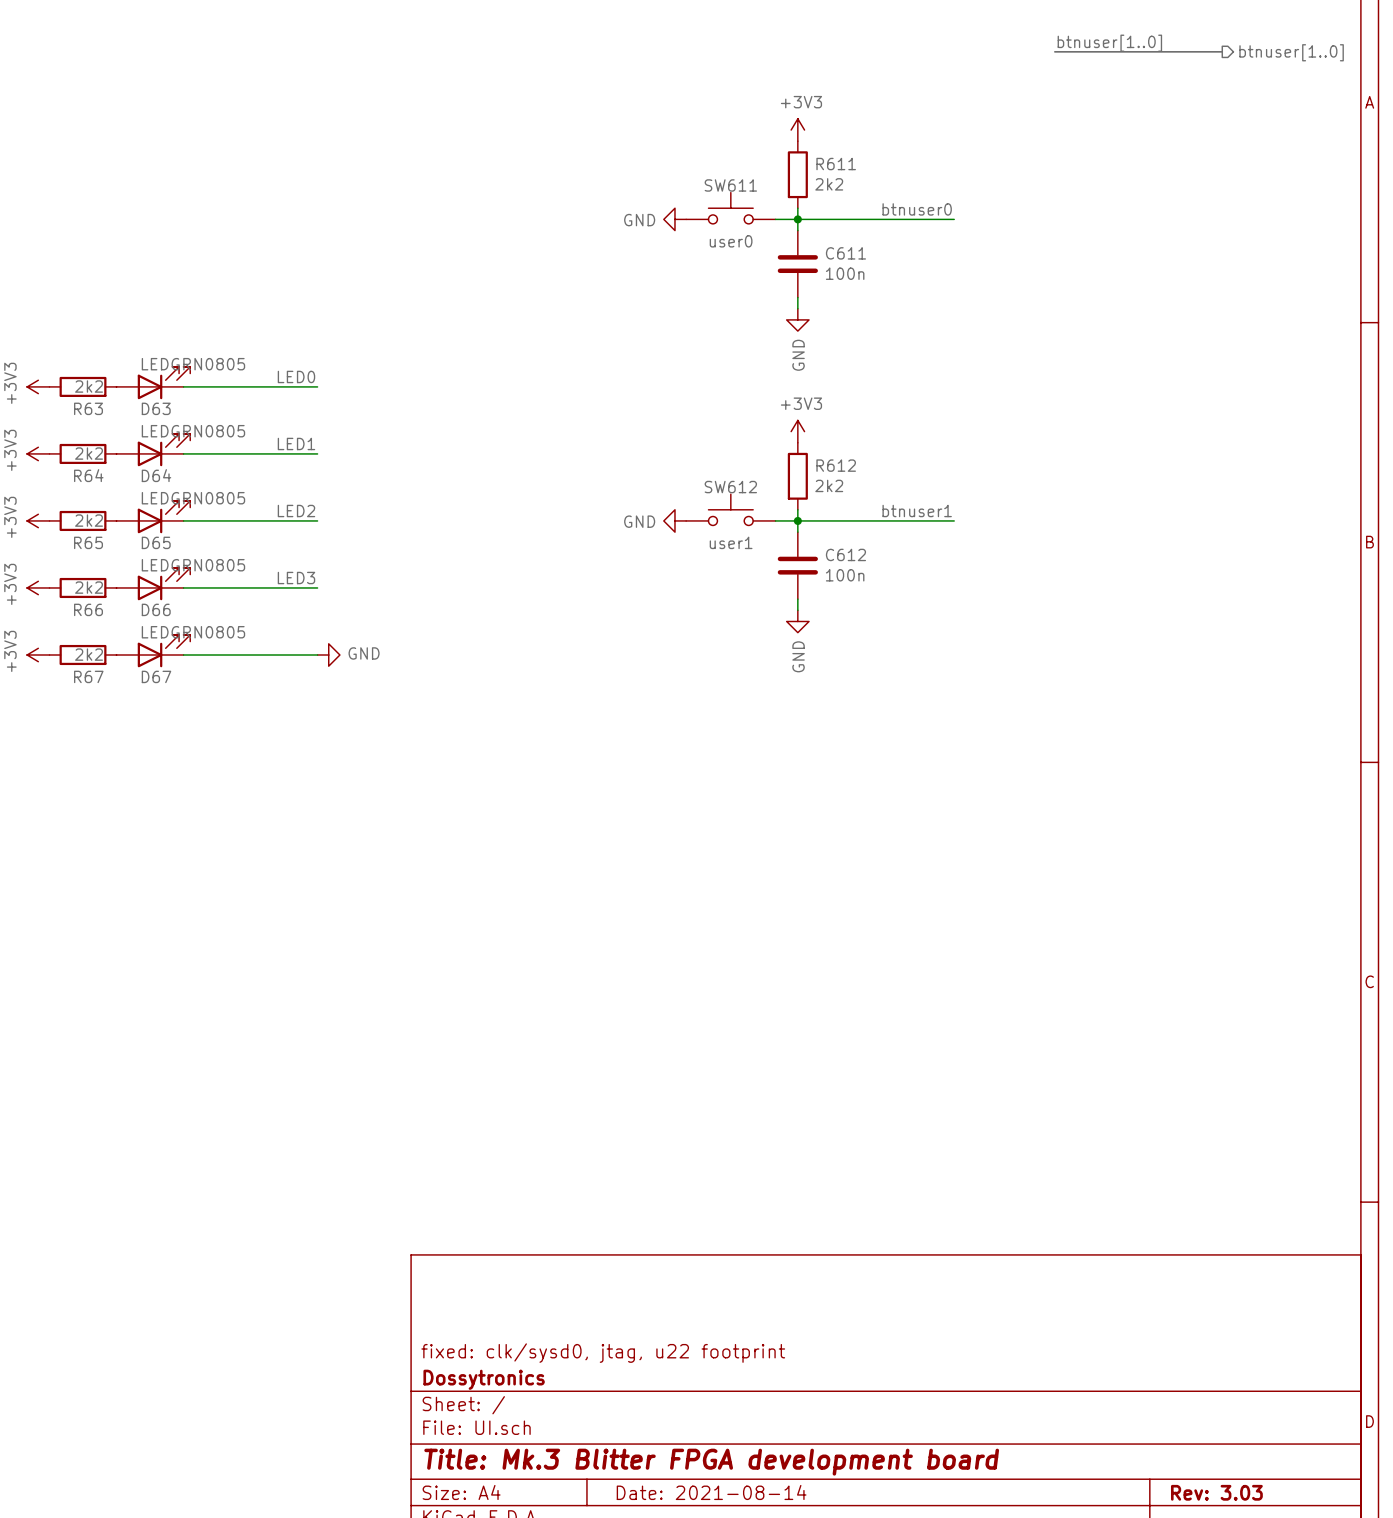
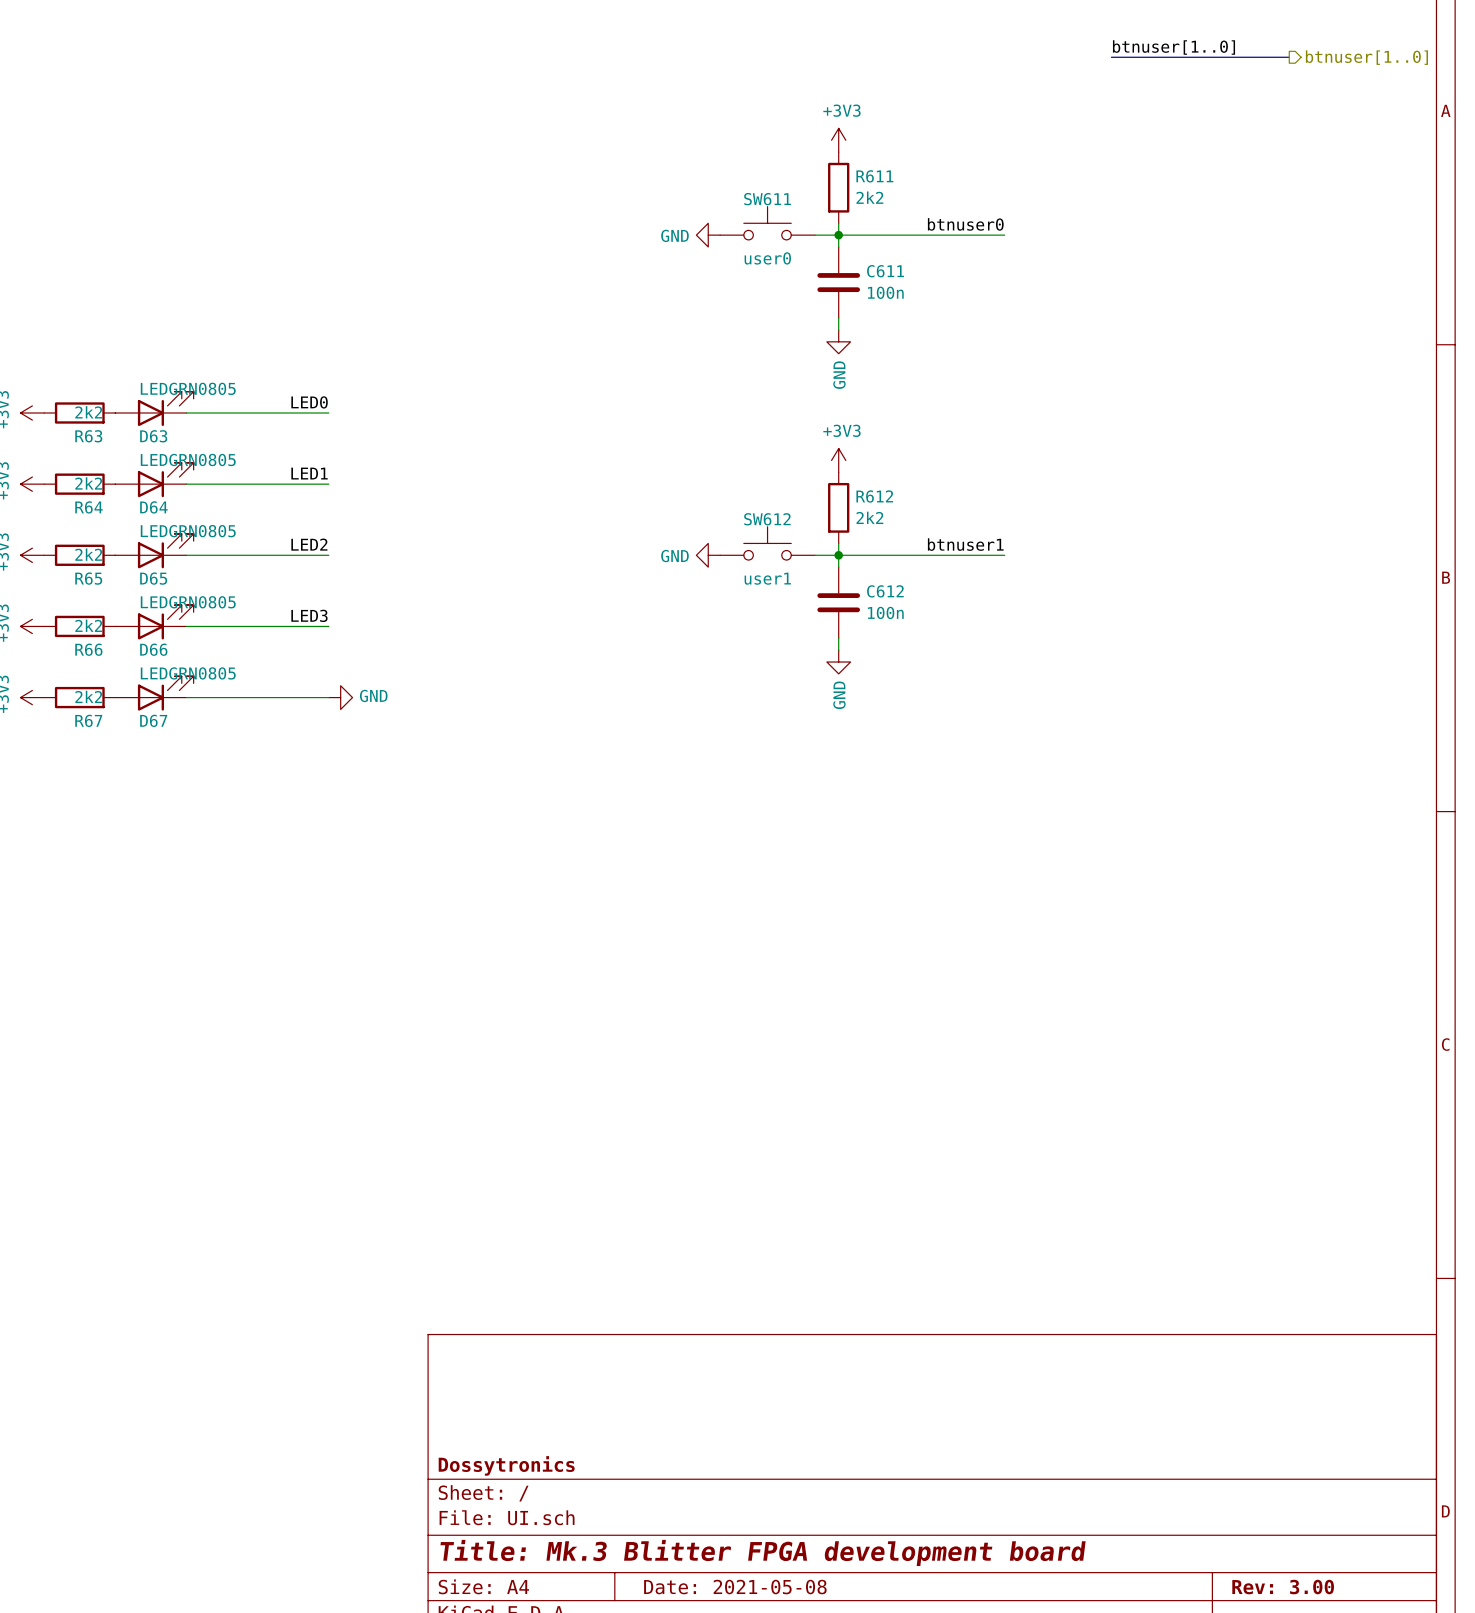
title block: fixed: clk/sysd0, jtag, u22 footprint (603, 1353) -> none
title block: Date: 2021-08-14 (711, 1492) -> Date: 2021-05-08 (735, 1587)
title block: Rev: 3.03 (1216, 1492) -> Rev: 3.00 (1283, 1587)

